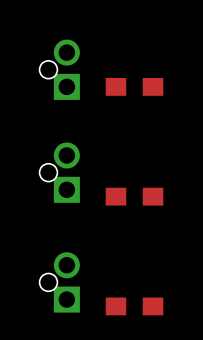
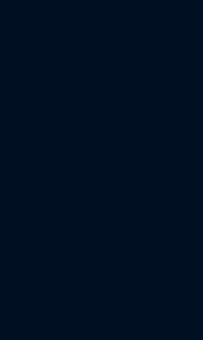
part: (59, 69) -> none
part: (134, 86) -> none
part: (59, 172) -> none
part: (134, 196) -> none
part: (59, 282) -> none
part: (134, 306) -> none

